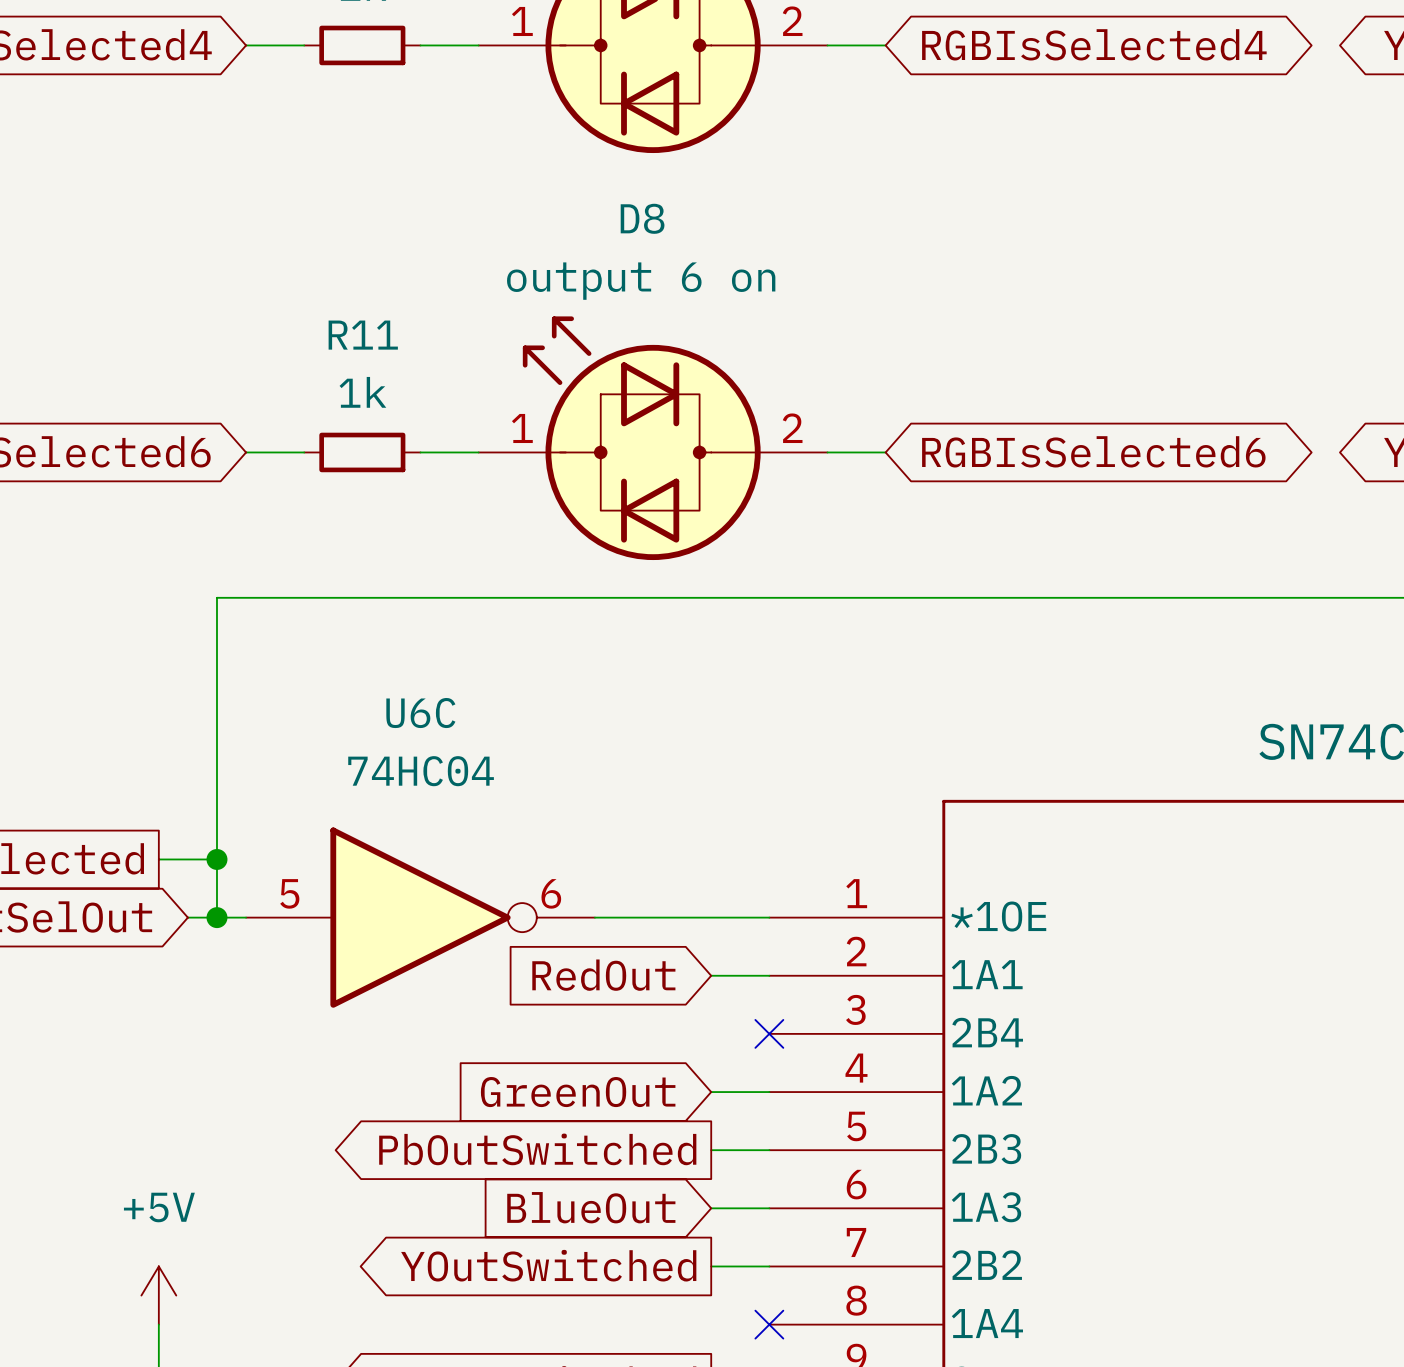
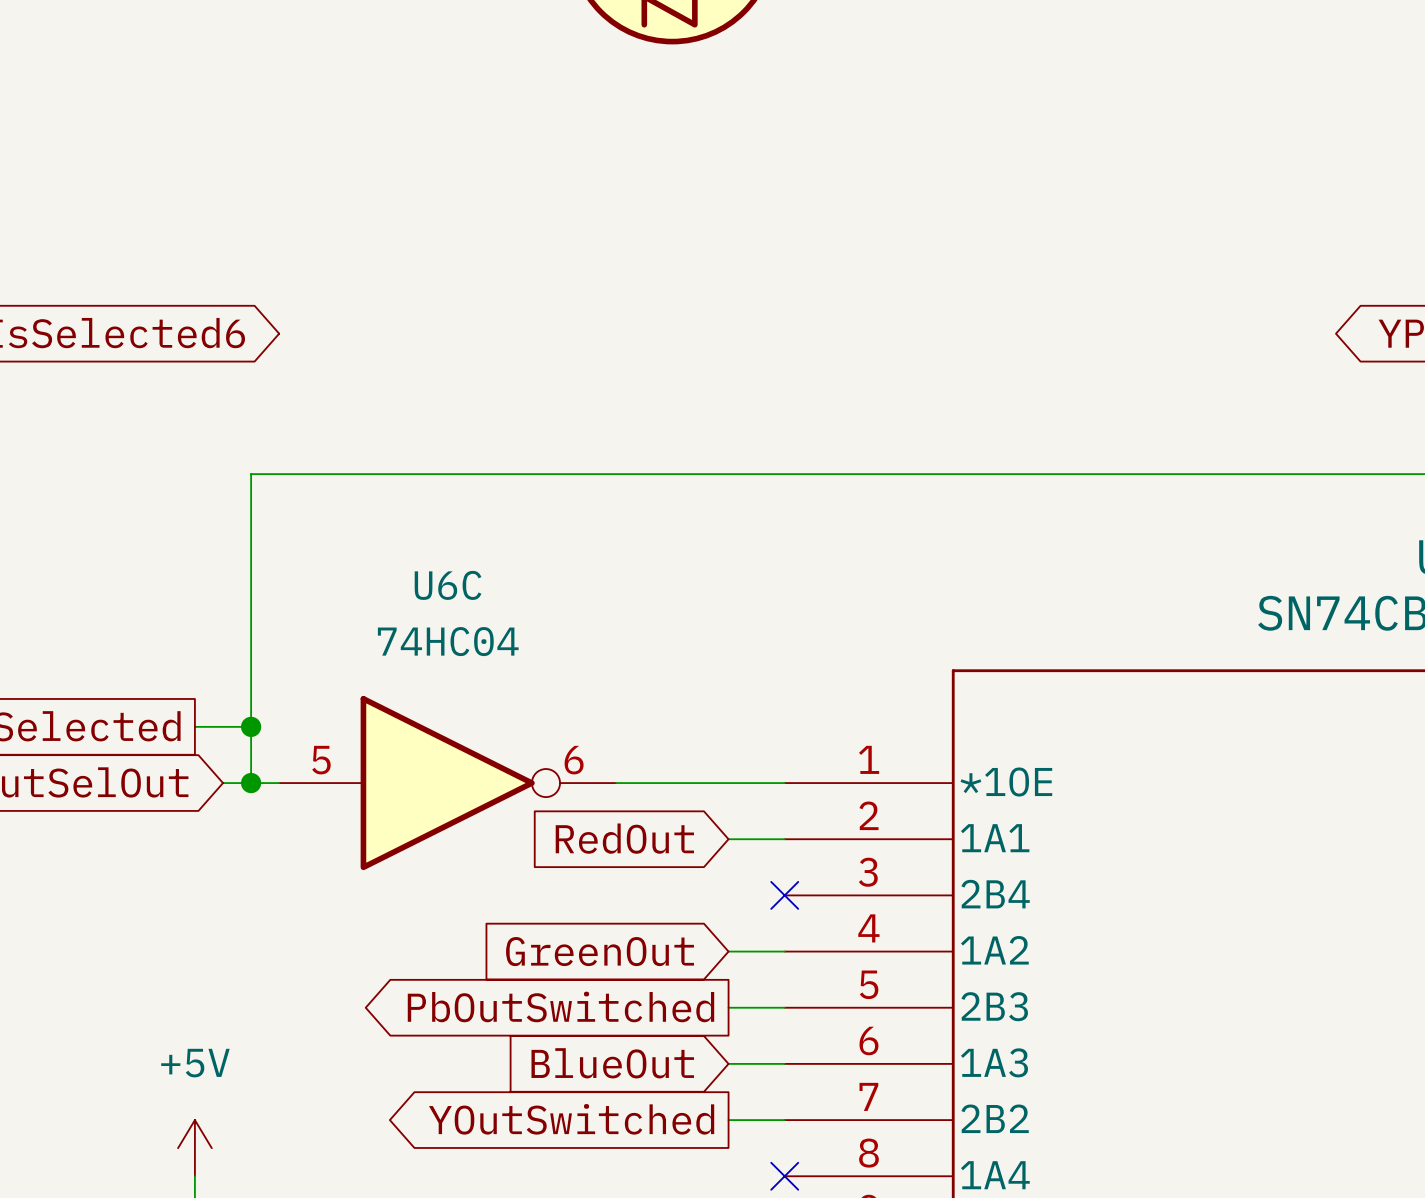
D8: output 6 on (653, 438) -> none
global label: RGBIsSelected6 (1093, 451) -> none
wire: (246, 452) (304, 452) -> none
R11: 1k (362, 452) -> none
wire: (420, 452) (478, 452) -> none
wire: (827, 452) (885, 452) -> none

